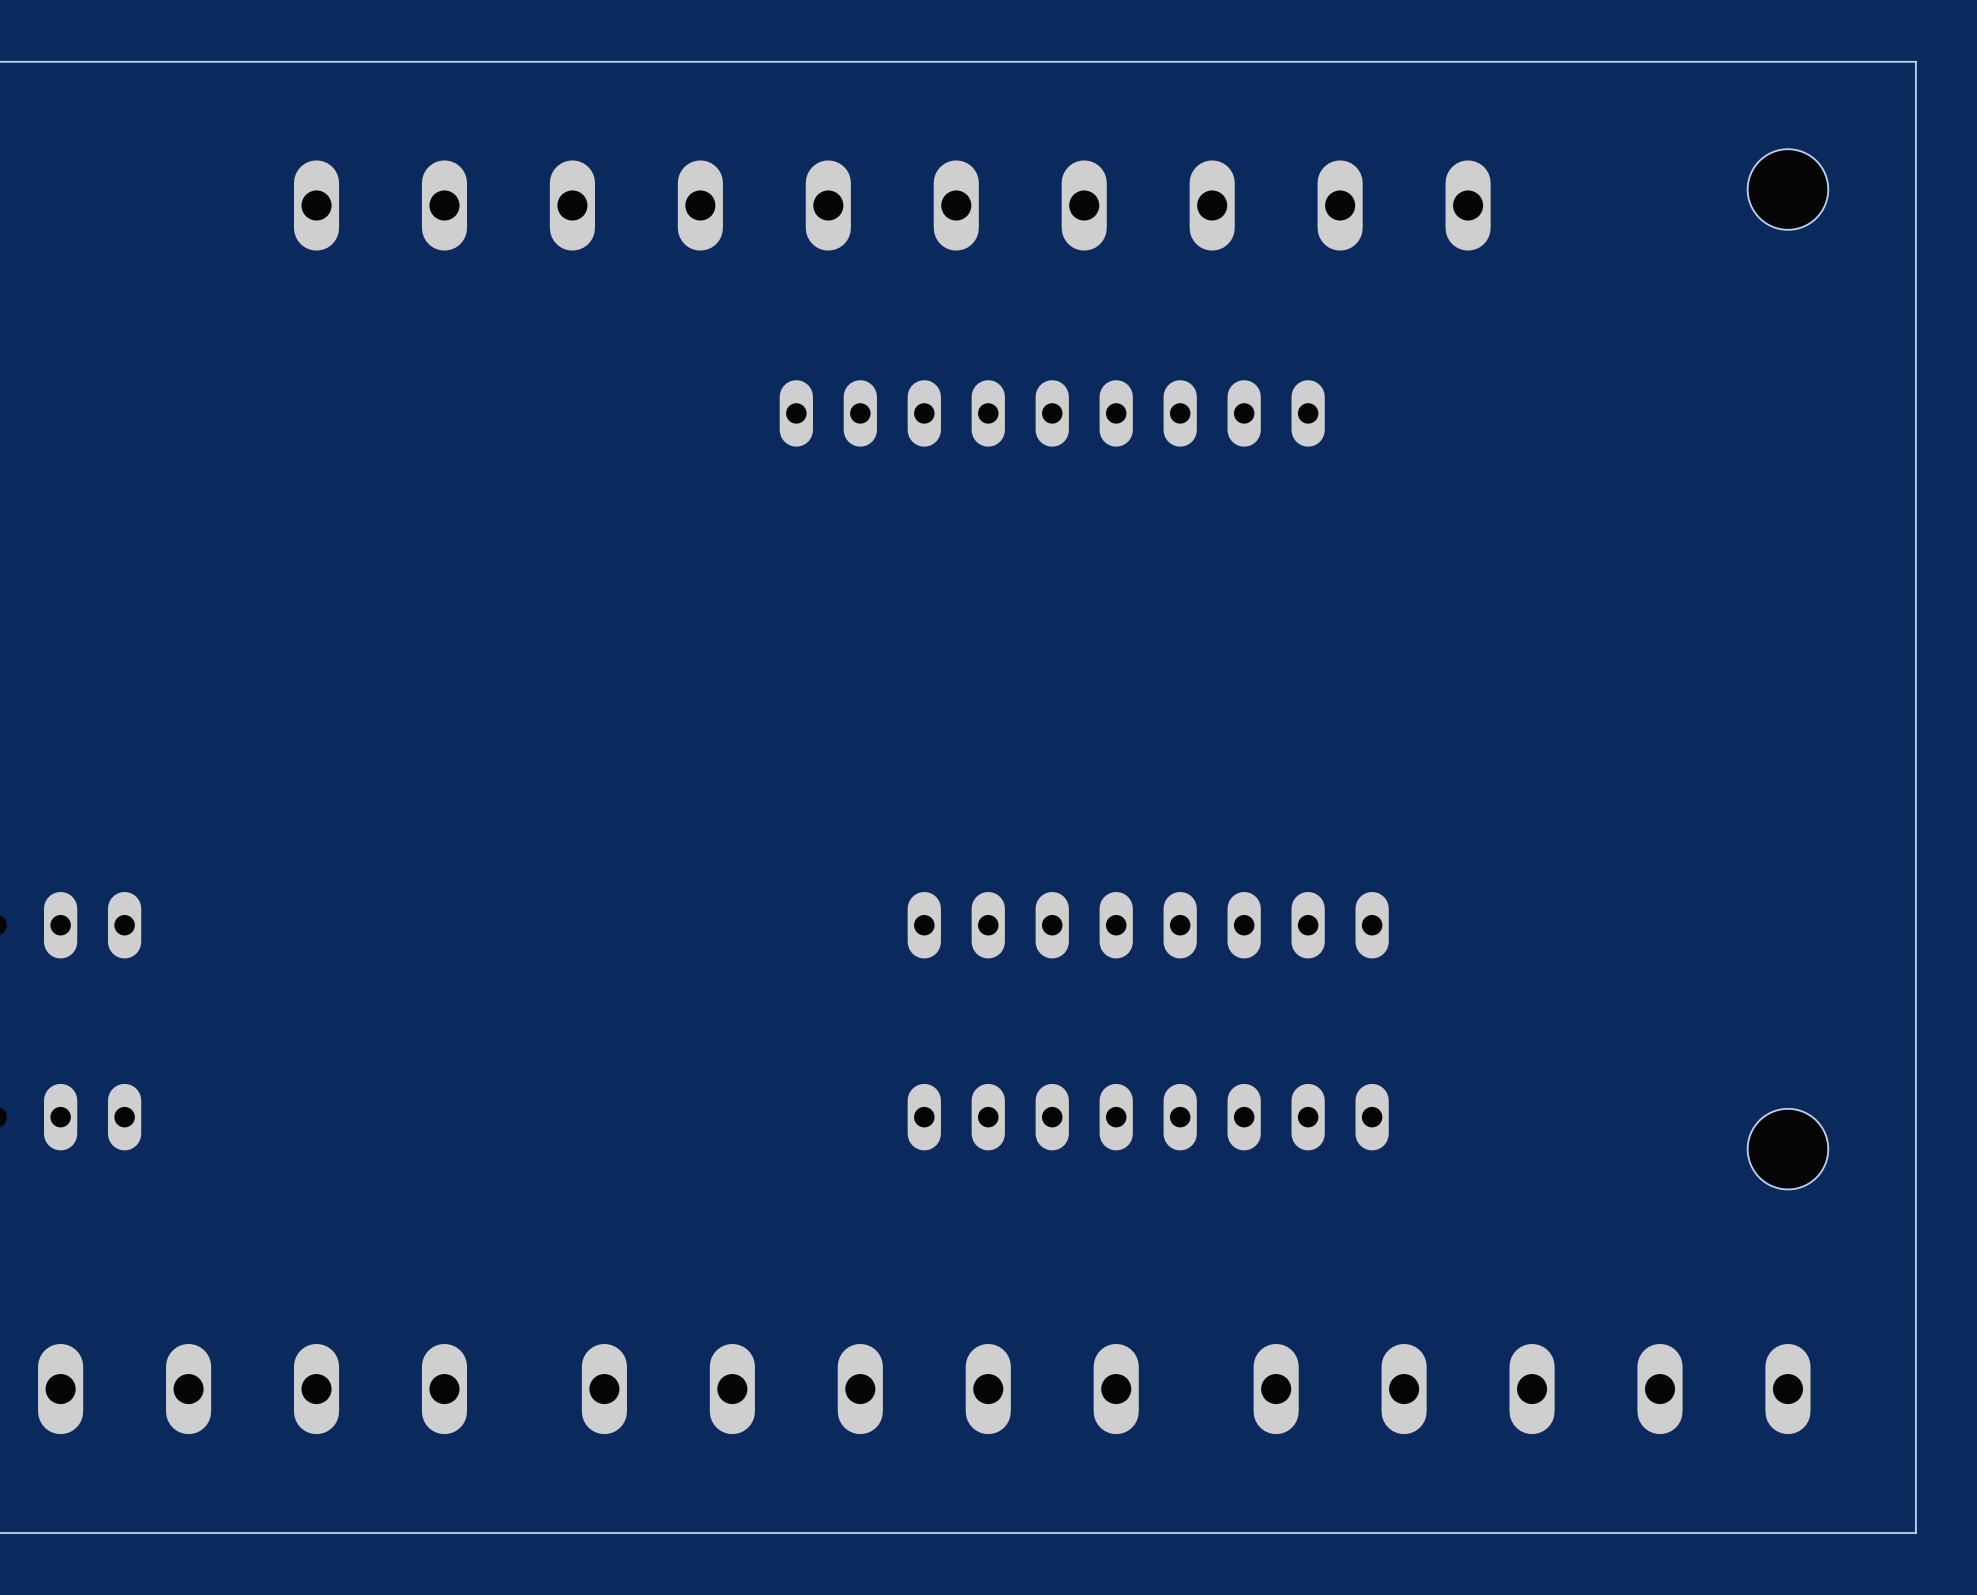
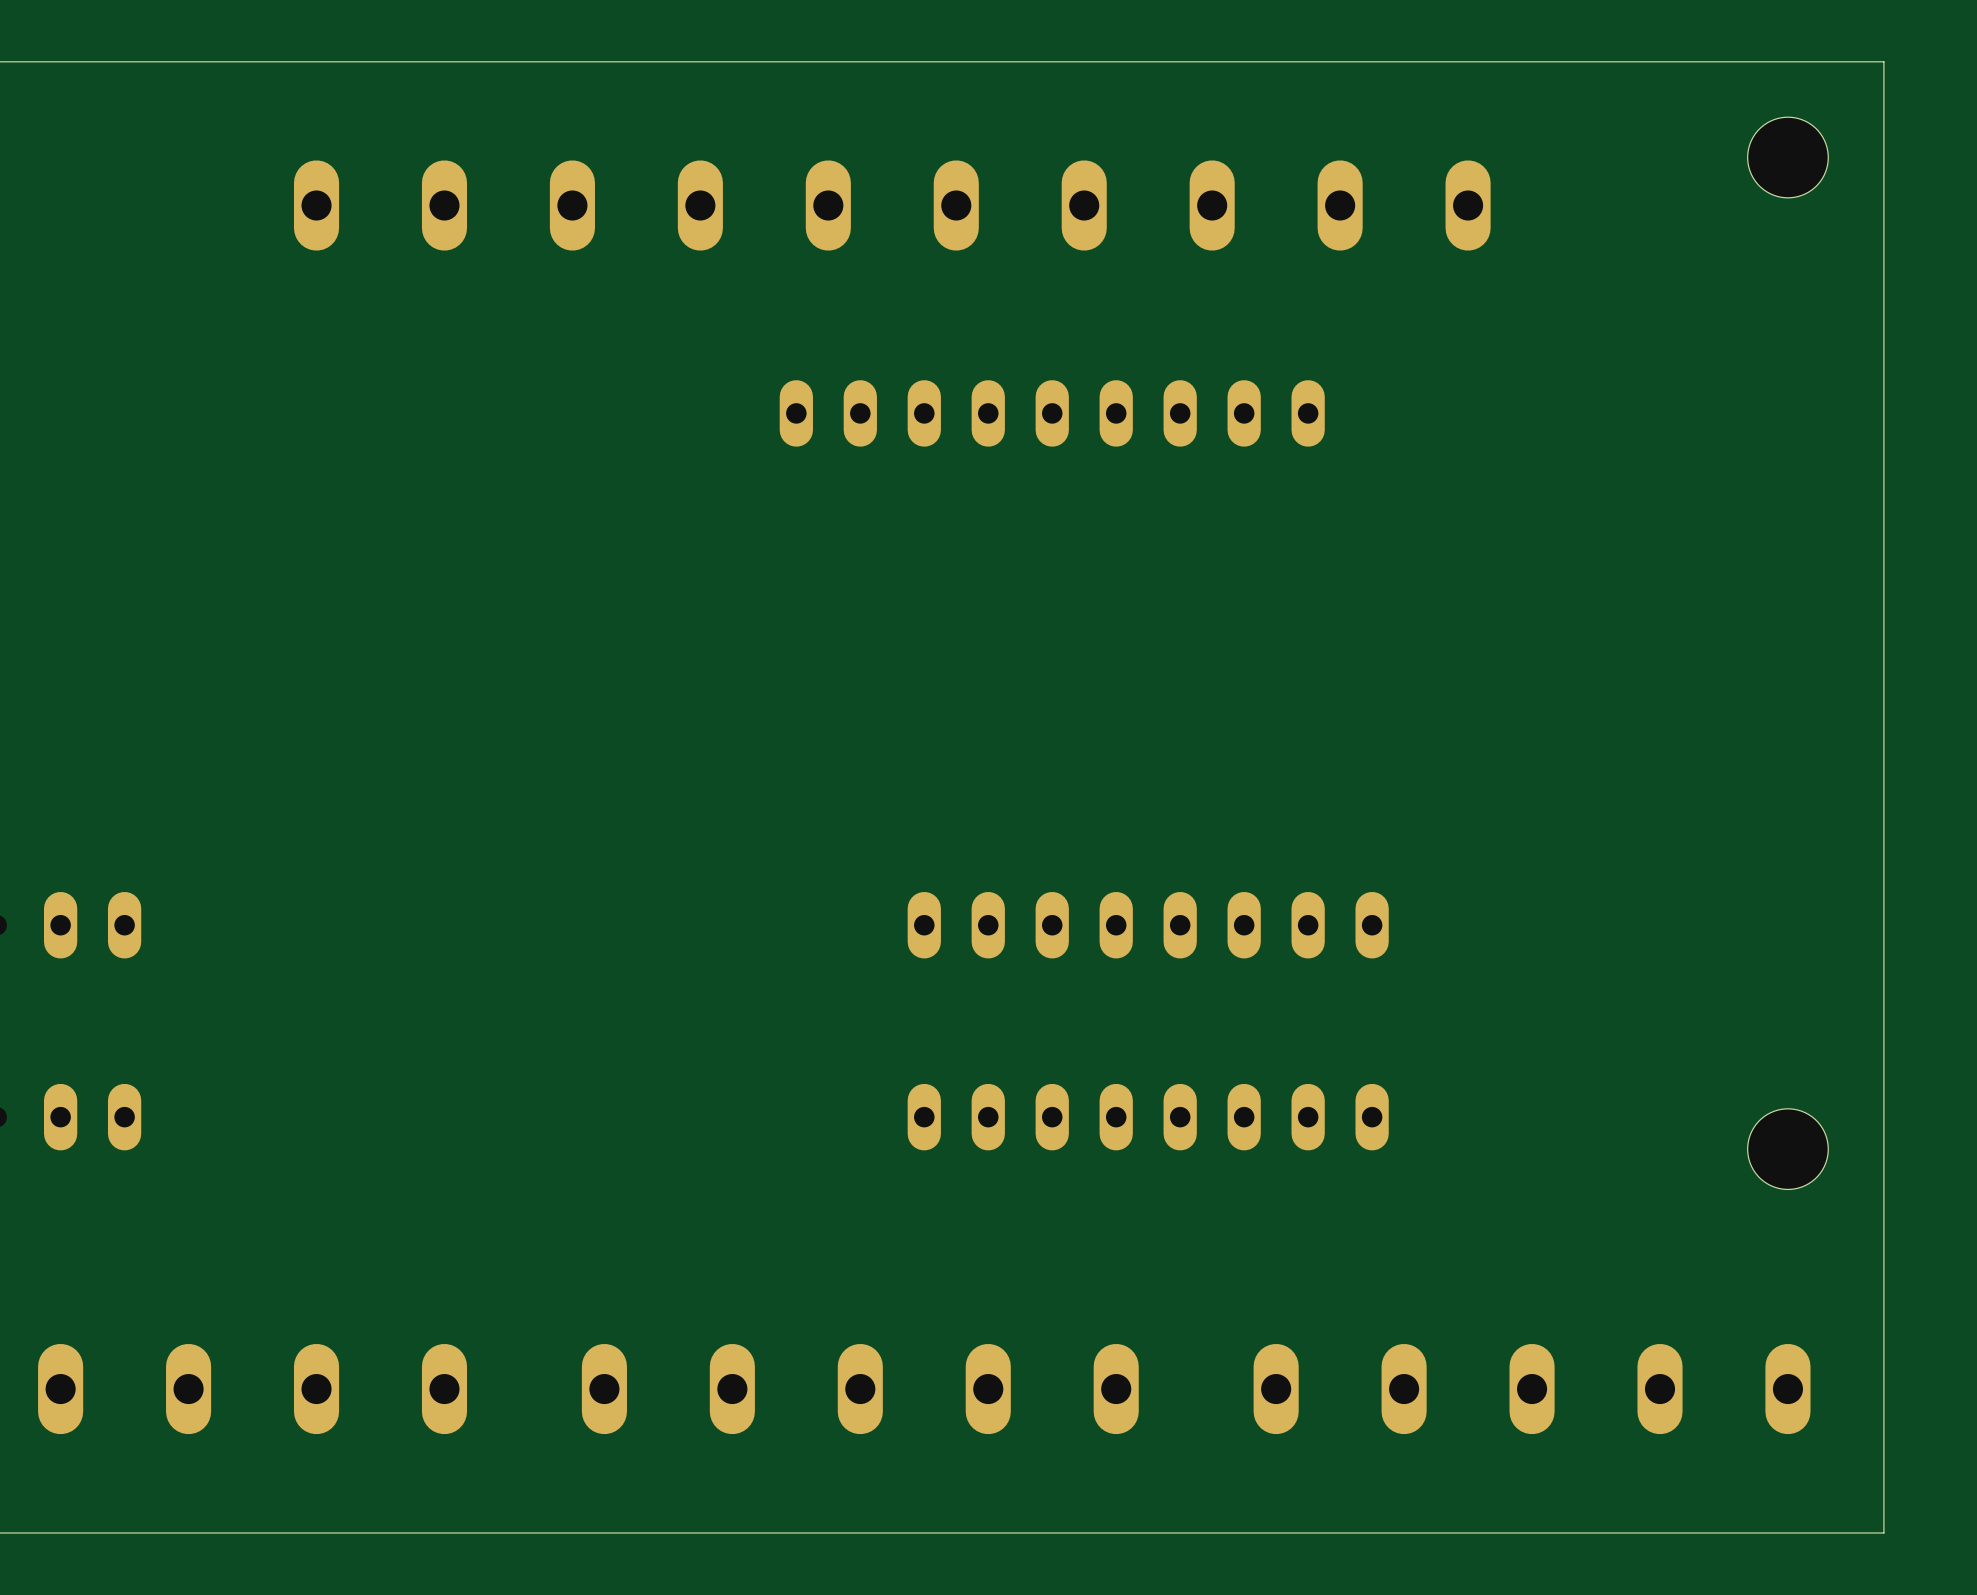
board edge: (1883, 61) (1915, 61) (1915, 1532) (1883, 1532) -> (1883, 61) (1883, 1532)
hole position: (1787, 189) -> (1787, 157)

